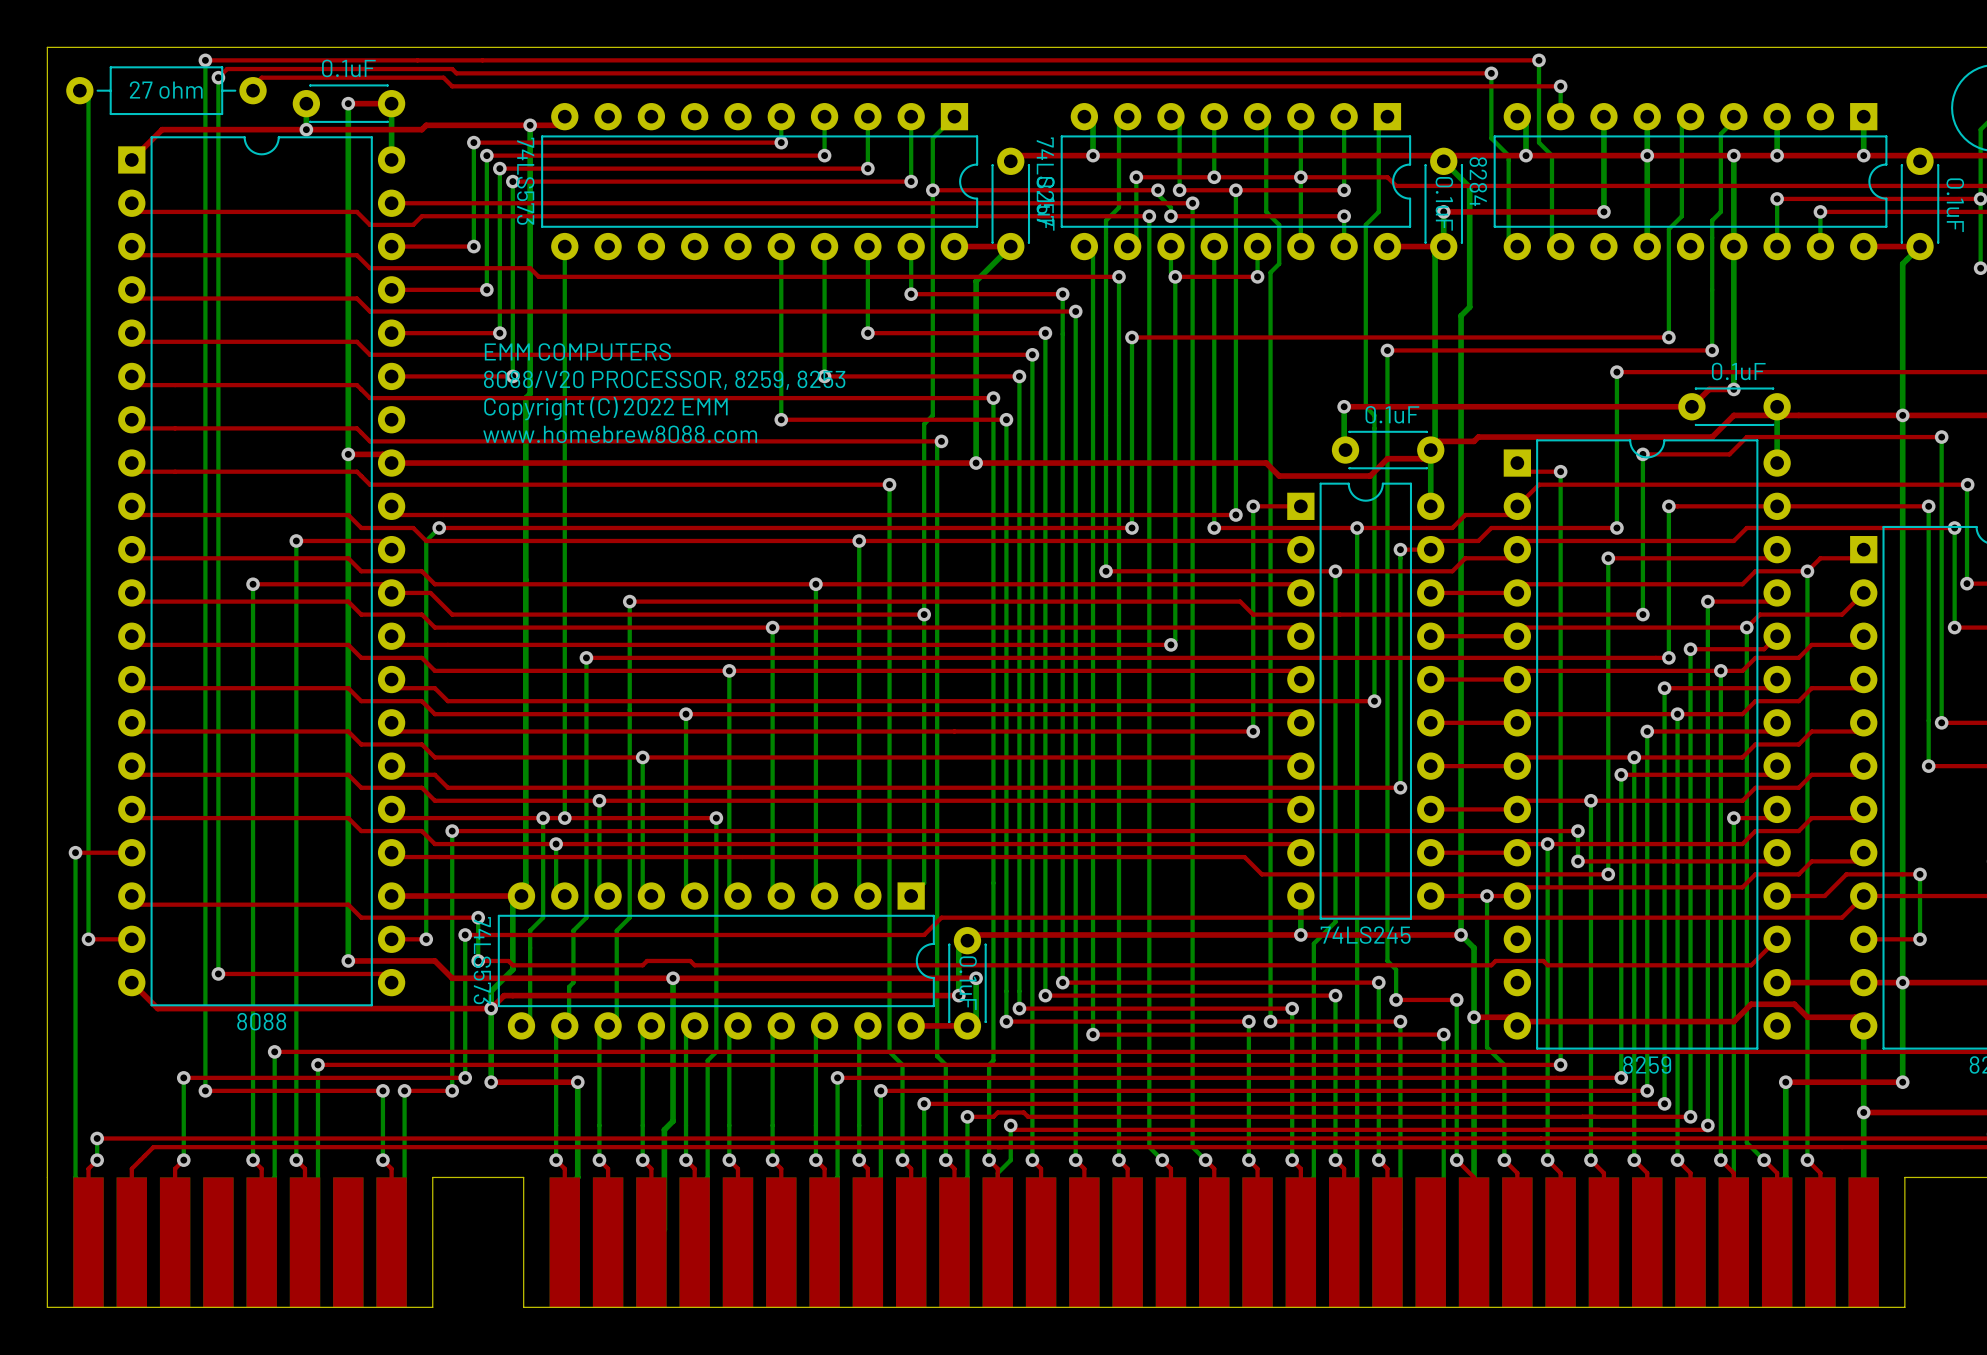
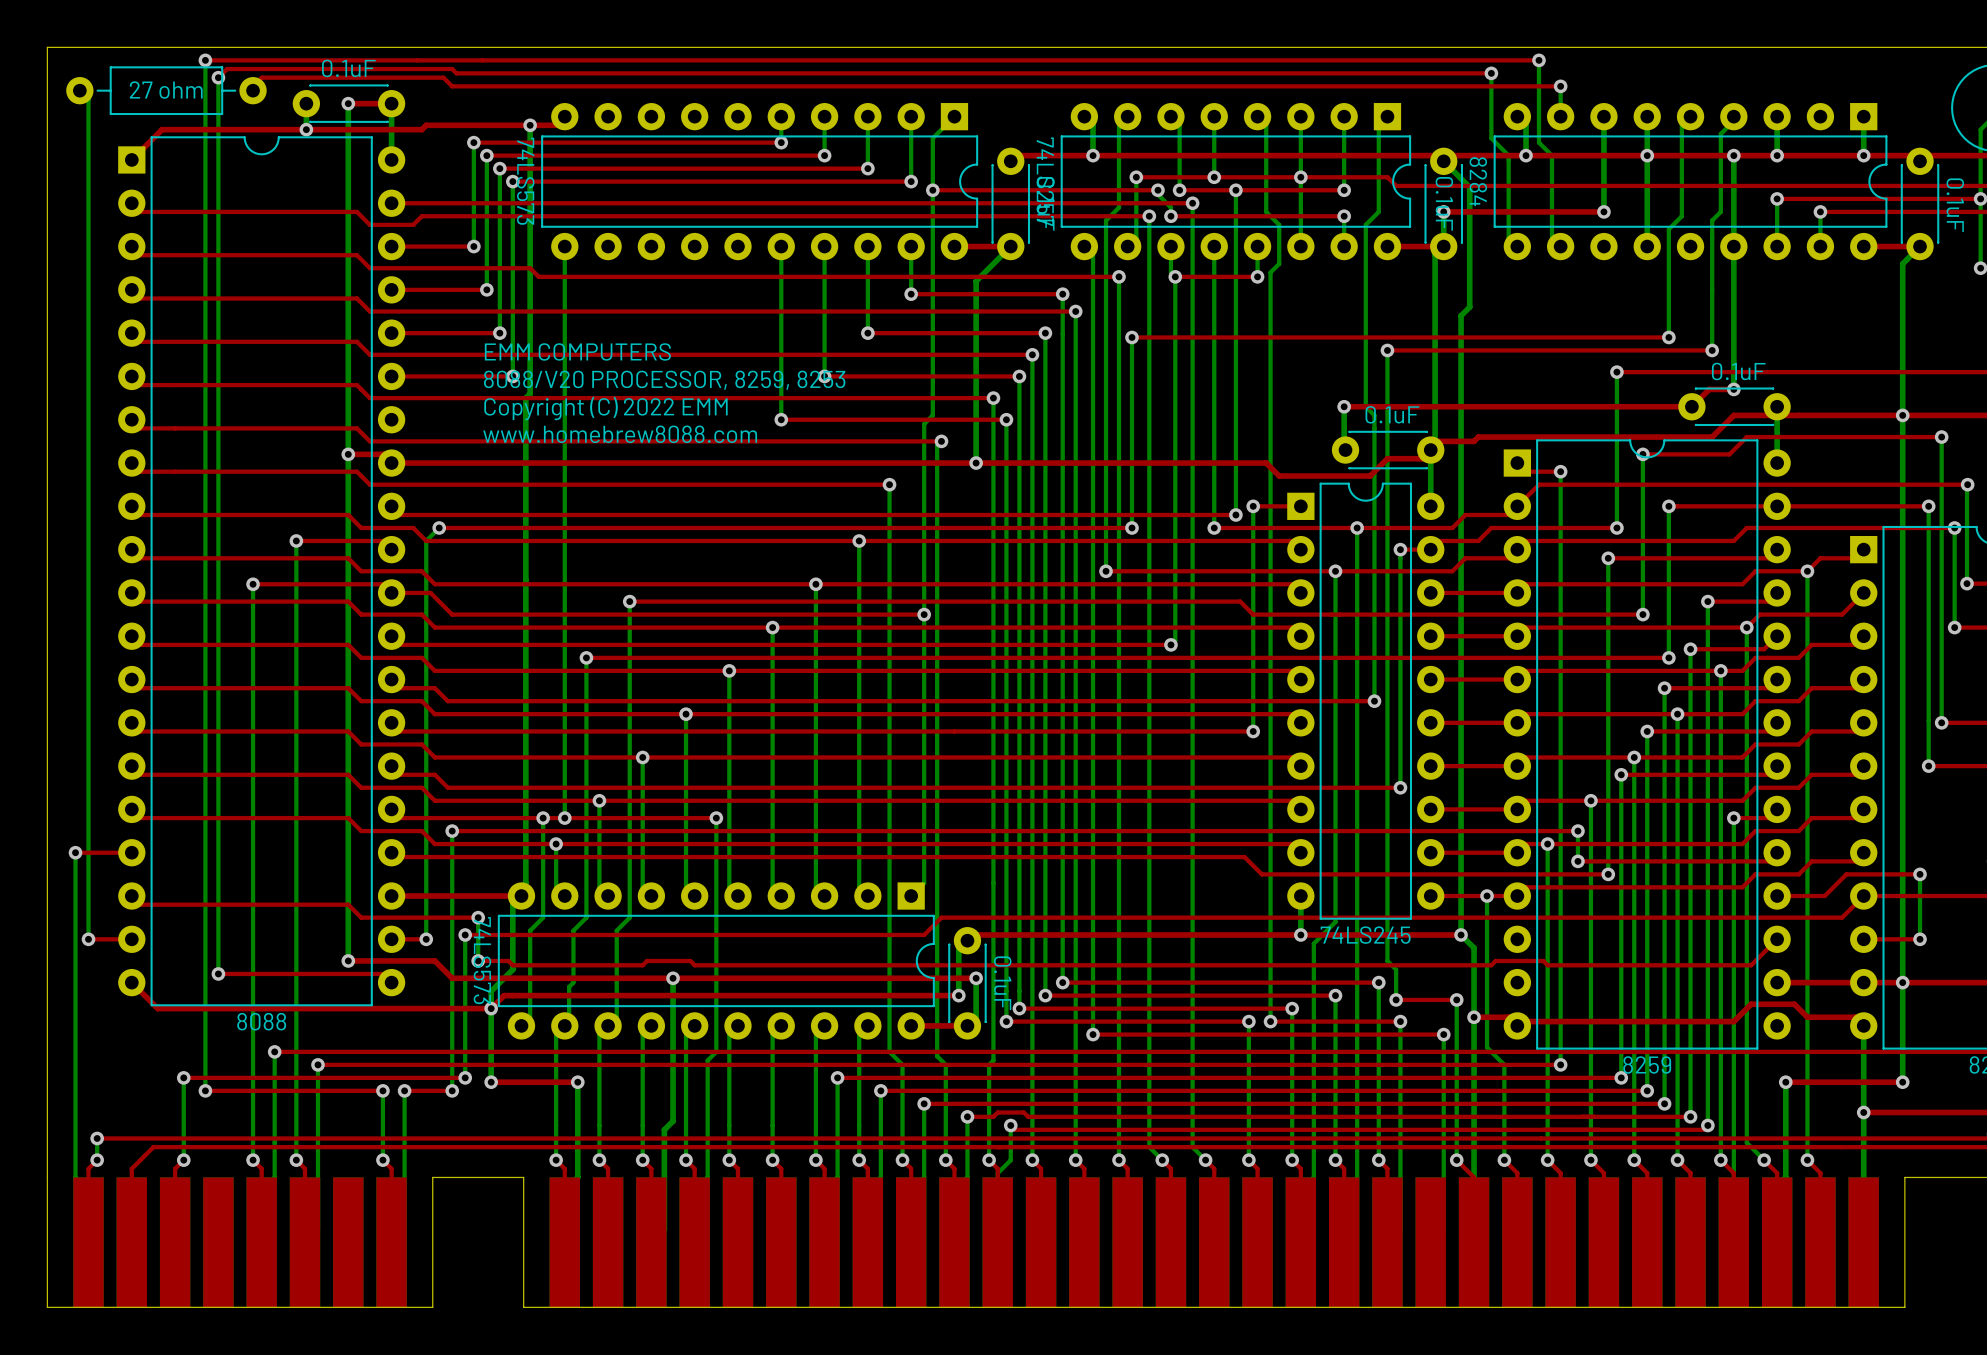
part value position: 0.1uF (968, 983) -> 0.1uF (1002, 983)

